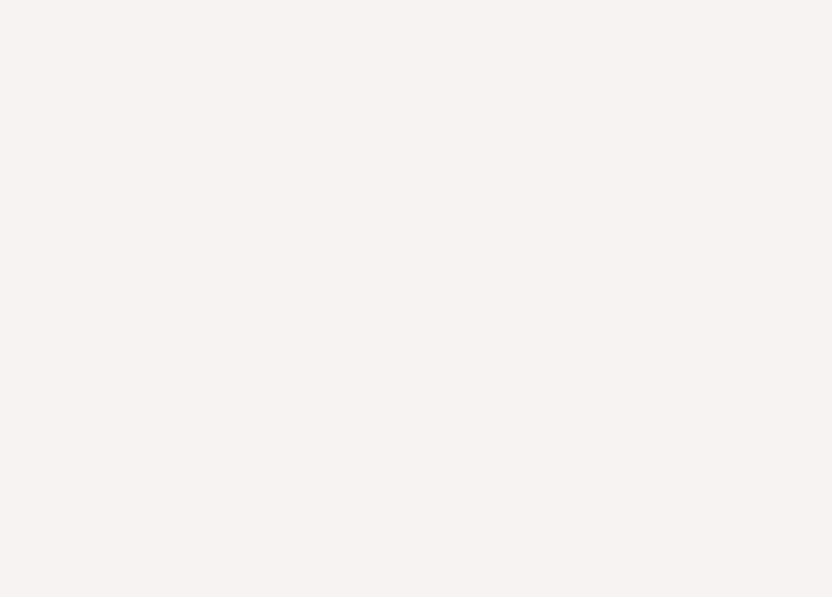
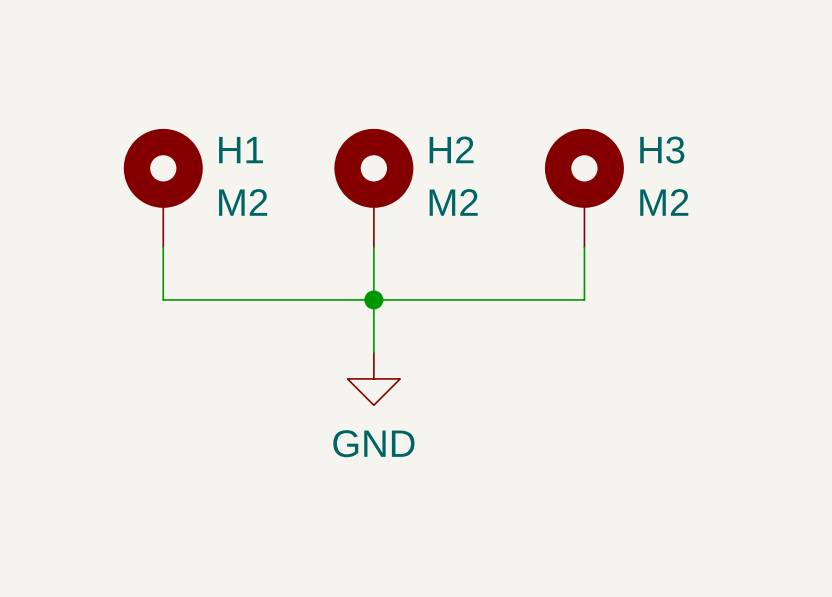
H1: none -> M2 (163, 188)
H2: none -> M2 (373, 188)
H3: none -> M2 (584, 188)
wire: none -> (163, 247) (163, 299) (584, 299) (584, 247)
wire: none -> (373, 247) (373, 352)
junction: none -> (373, 299)
power symbol: none -> GND (373, 378)

